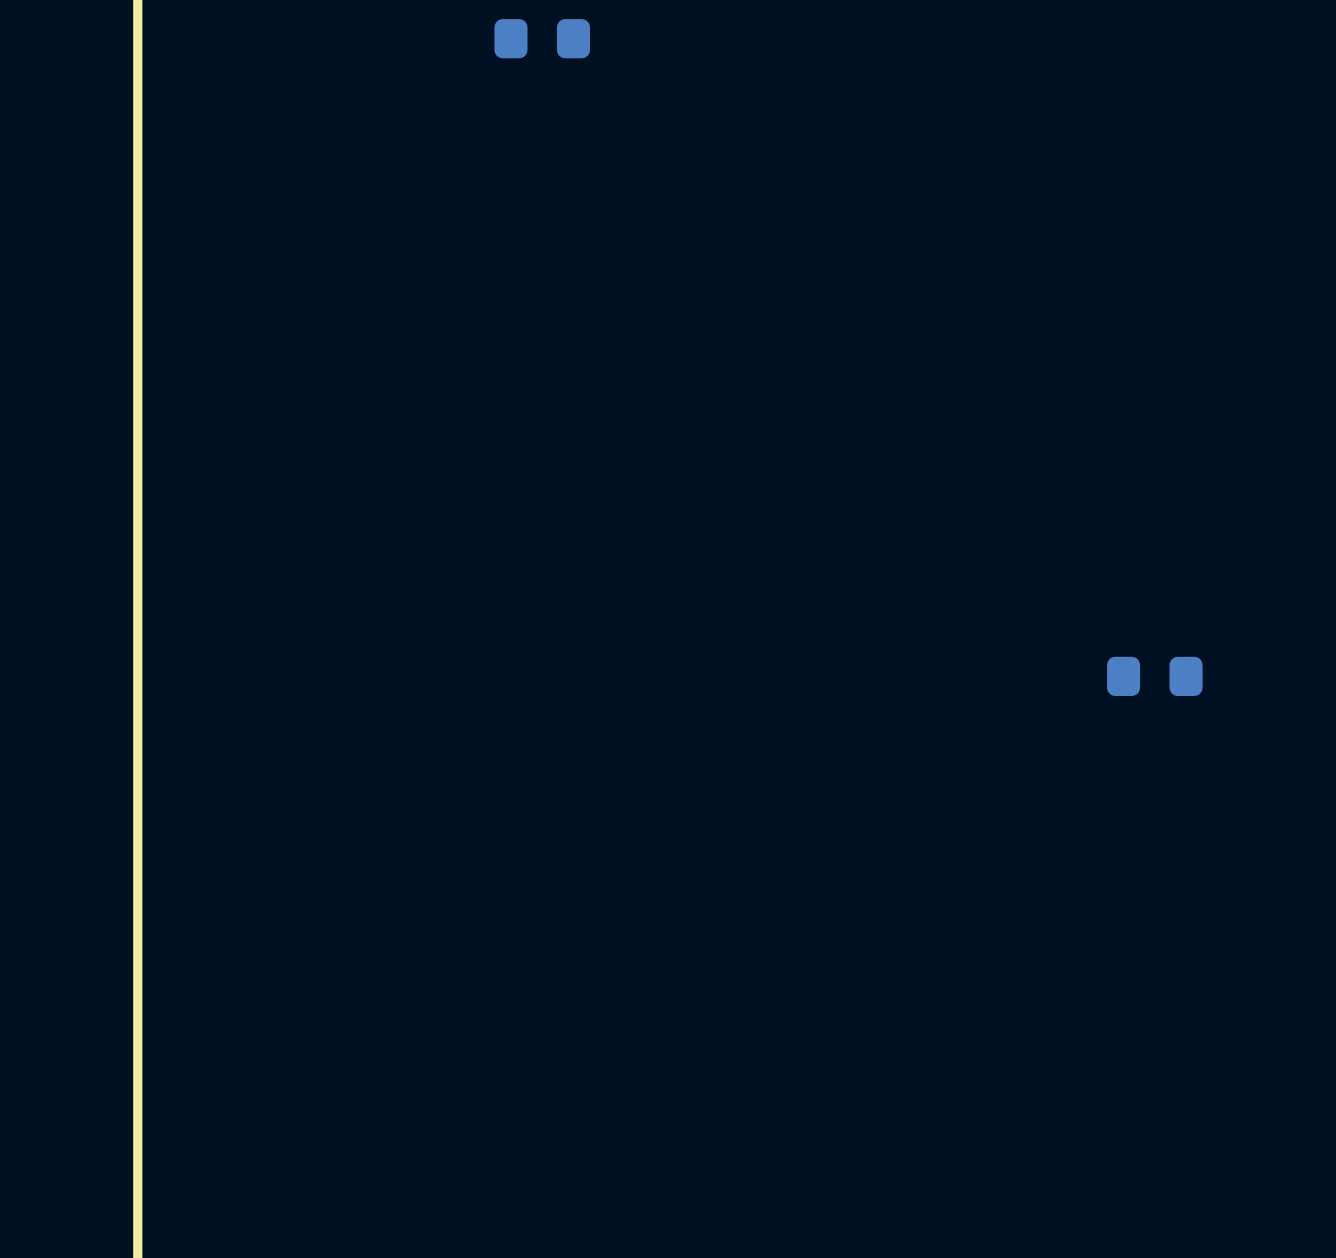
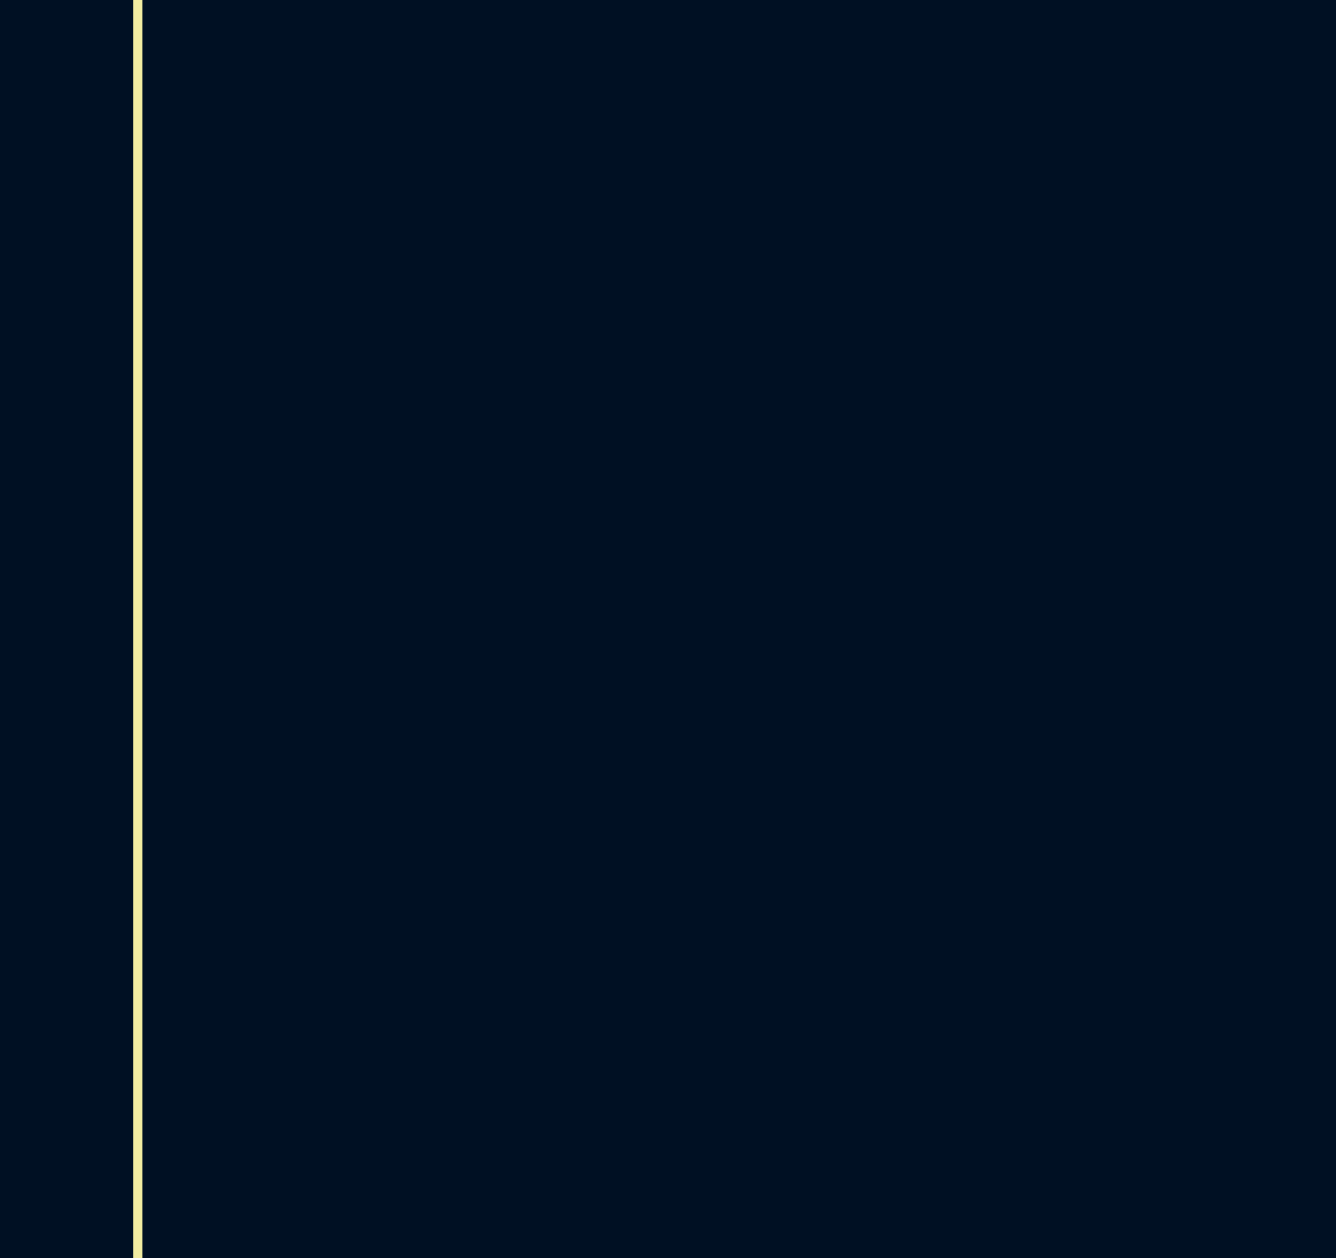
part: (542, 38) -> none
part: (1154, 676) -> none

